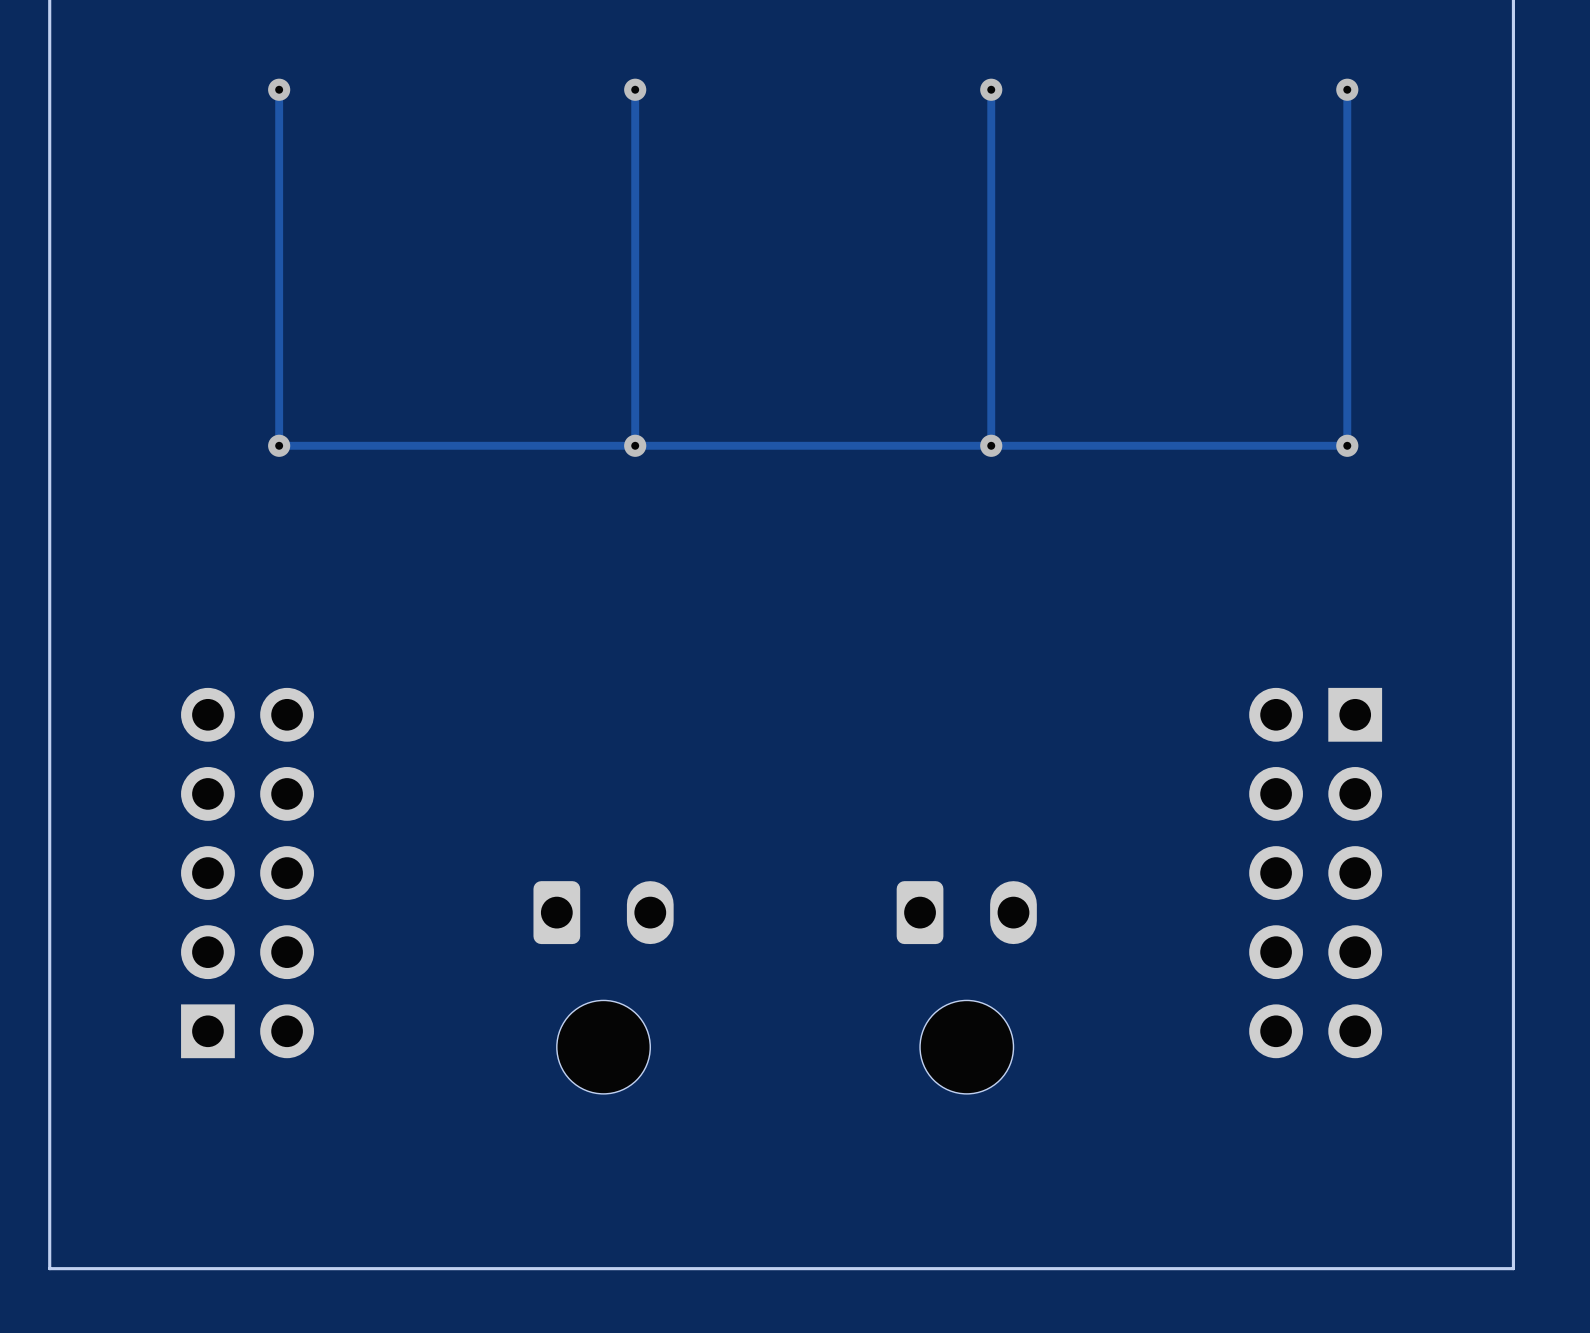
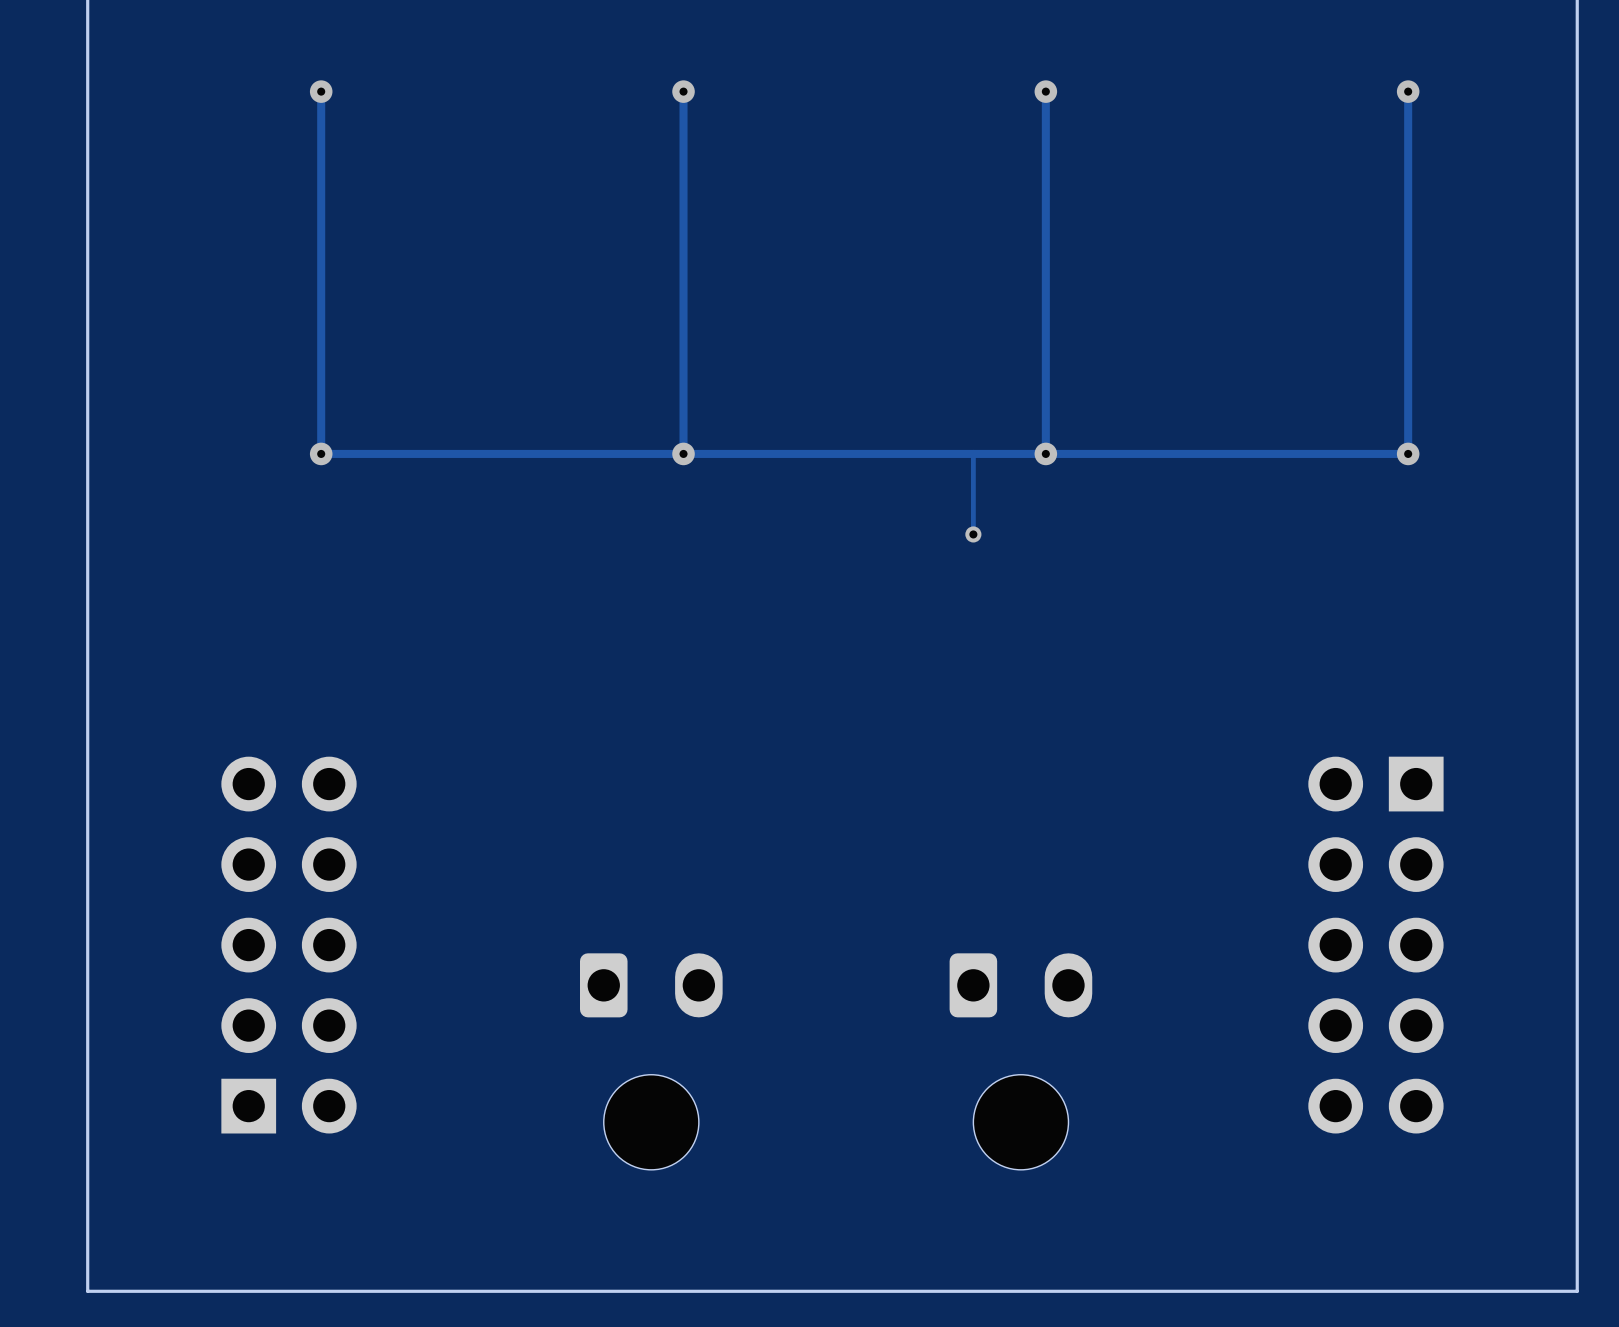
track: none -> (973, 453) (973, 534)
via: none -> (973, 534)
part position: (247, 873) -> (288, 945)
part position: (1315, 873) -> (1375, 945)
part position: (603, 987) -> (651, 1061)
part position: (966, 987) -> (1020, 1061)

